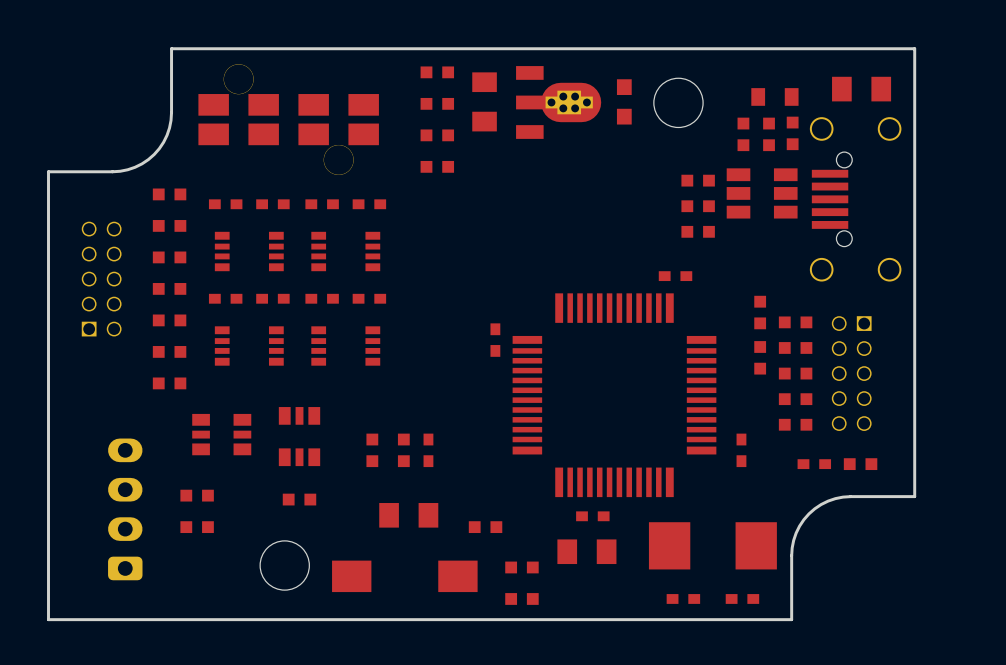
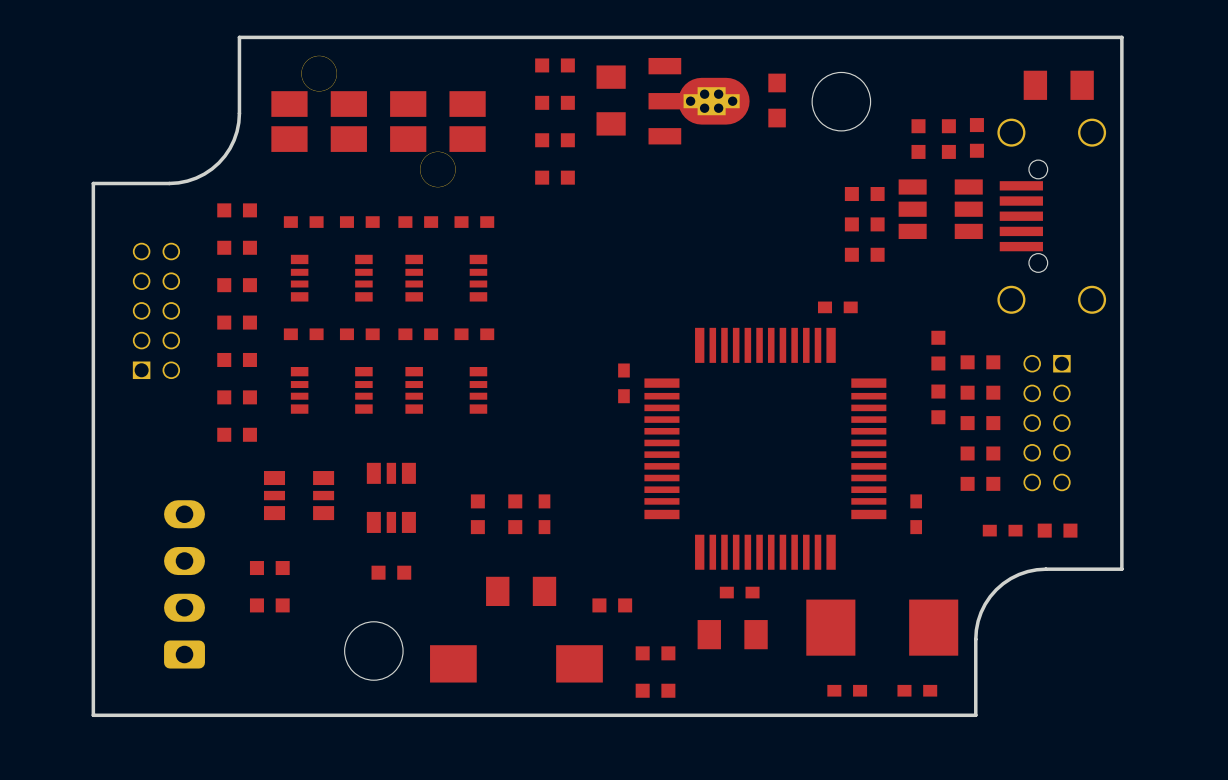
part: (774, 96) -> none

